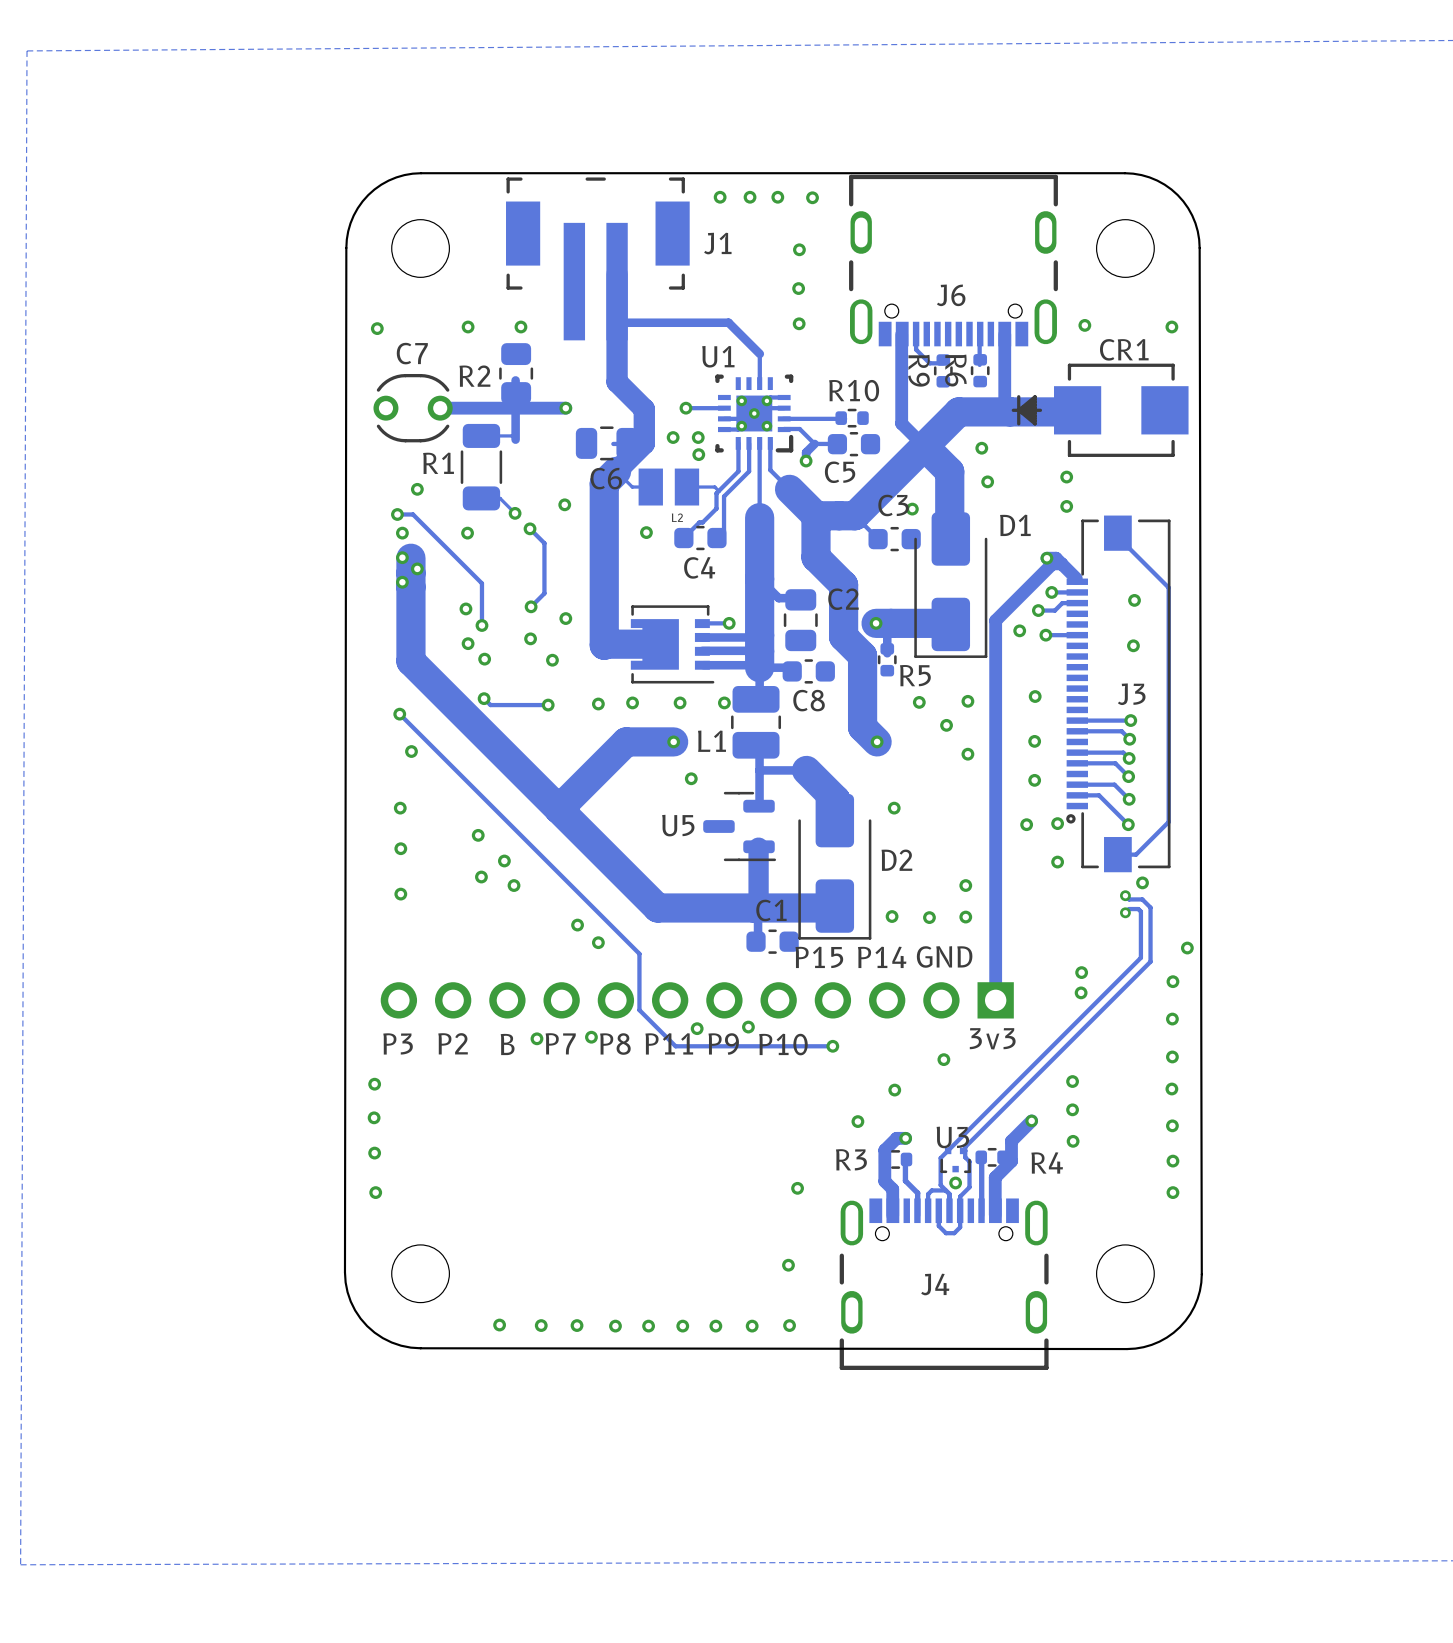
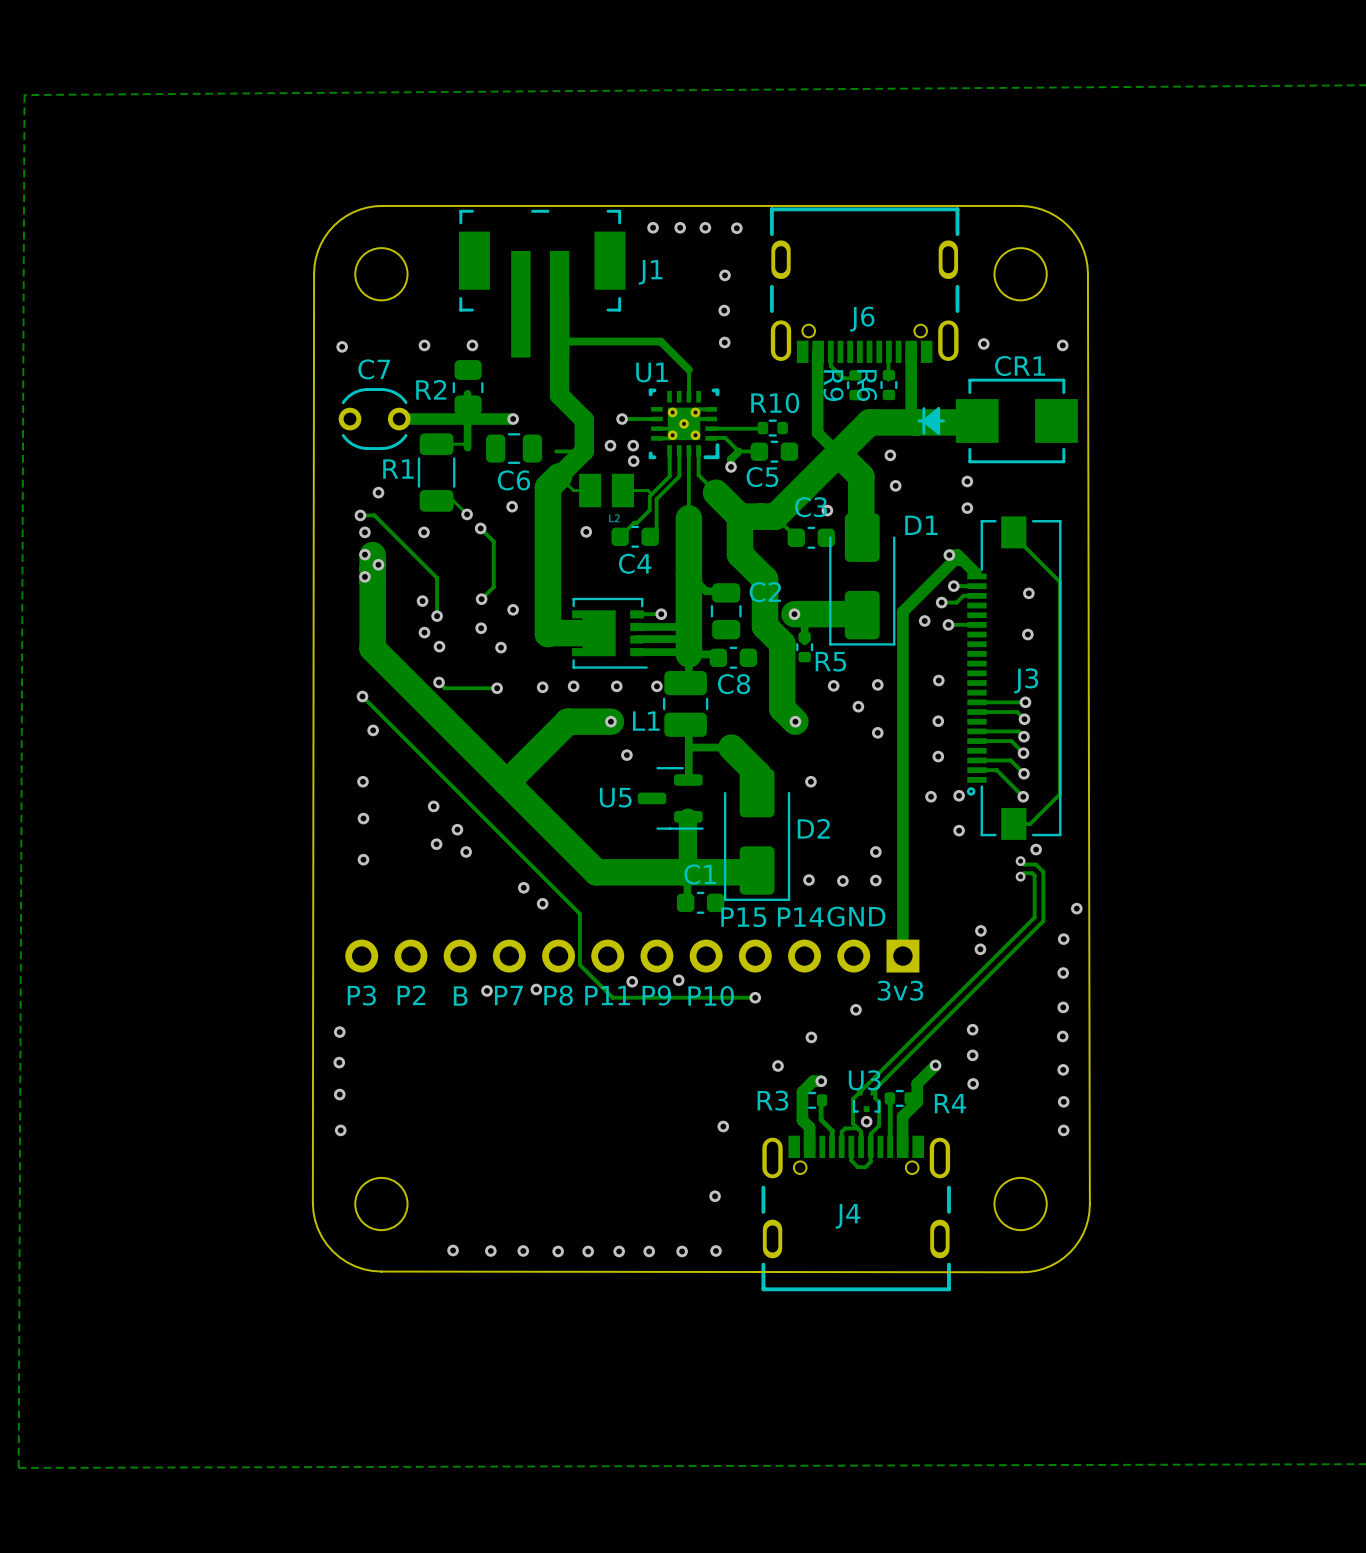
C6 position: (606, 443) -> (514, 448)

